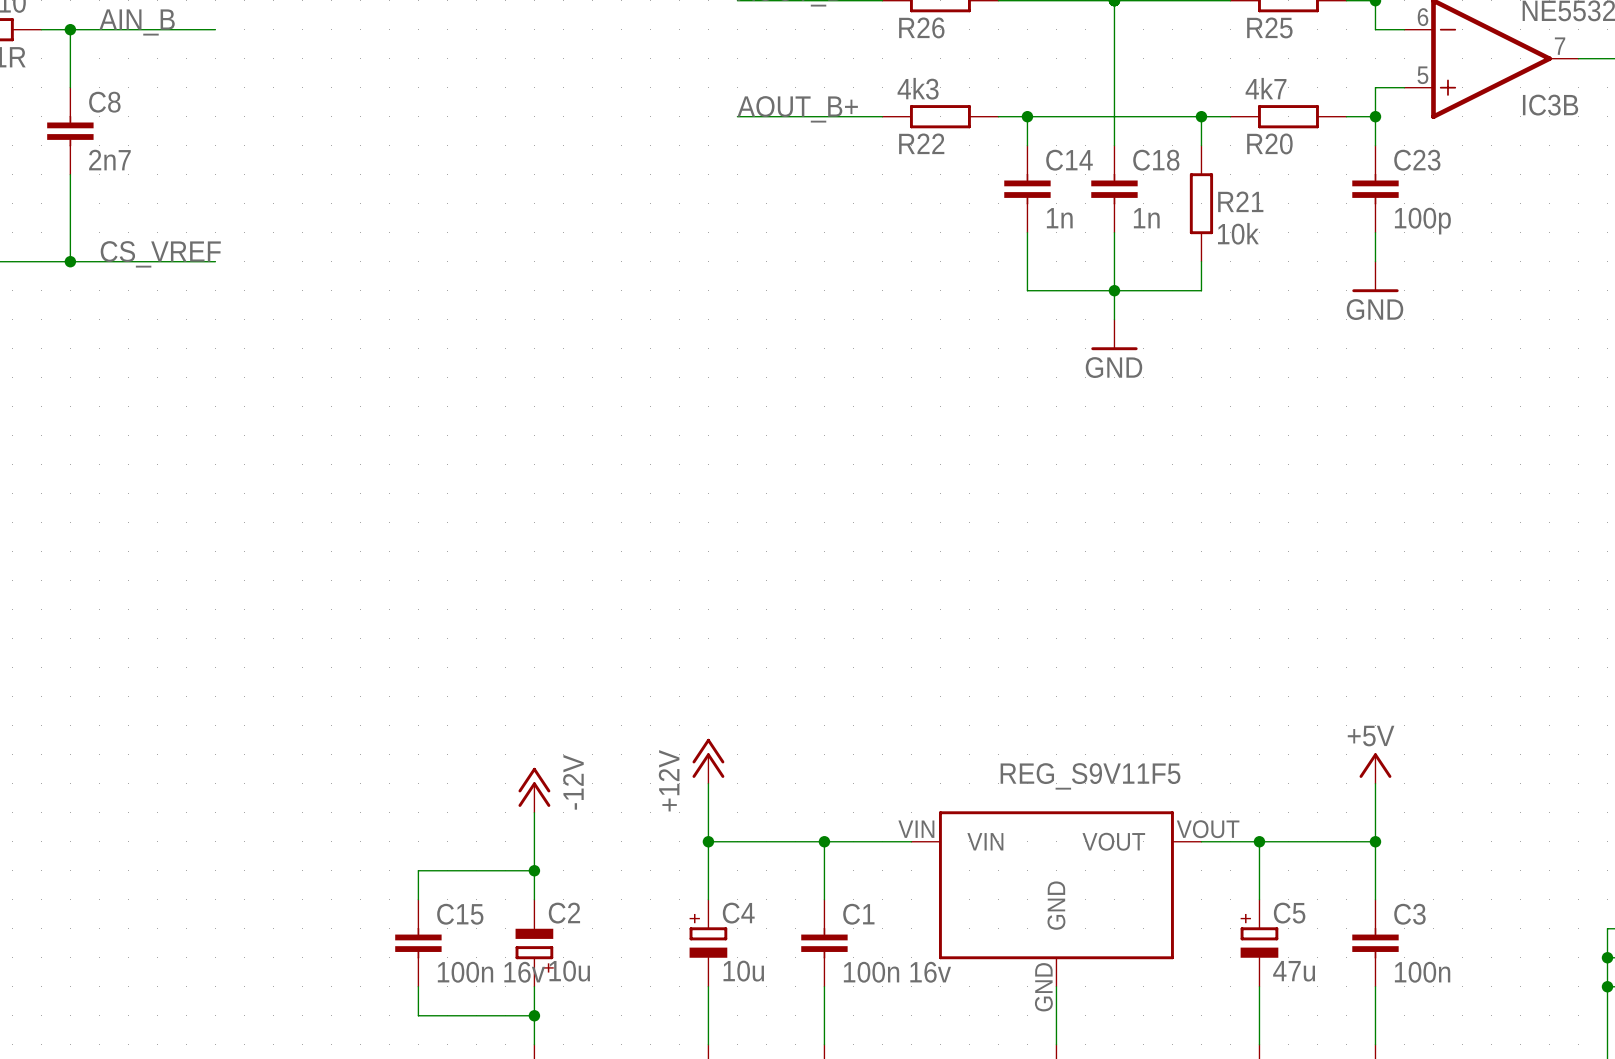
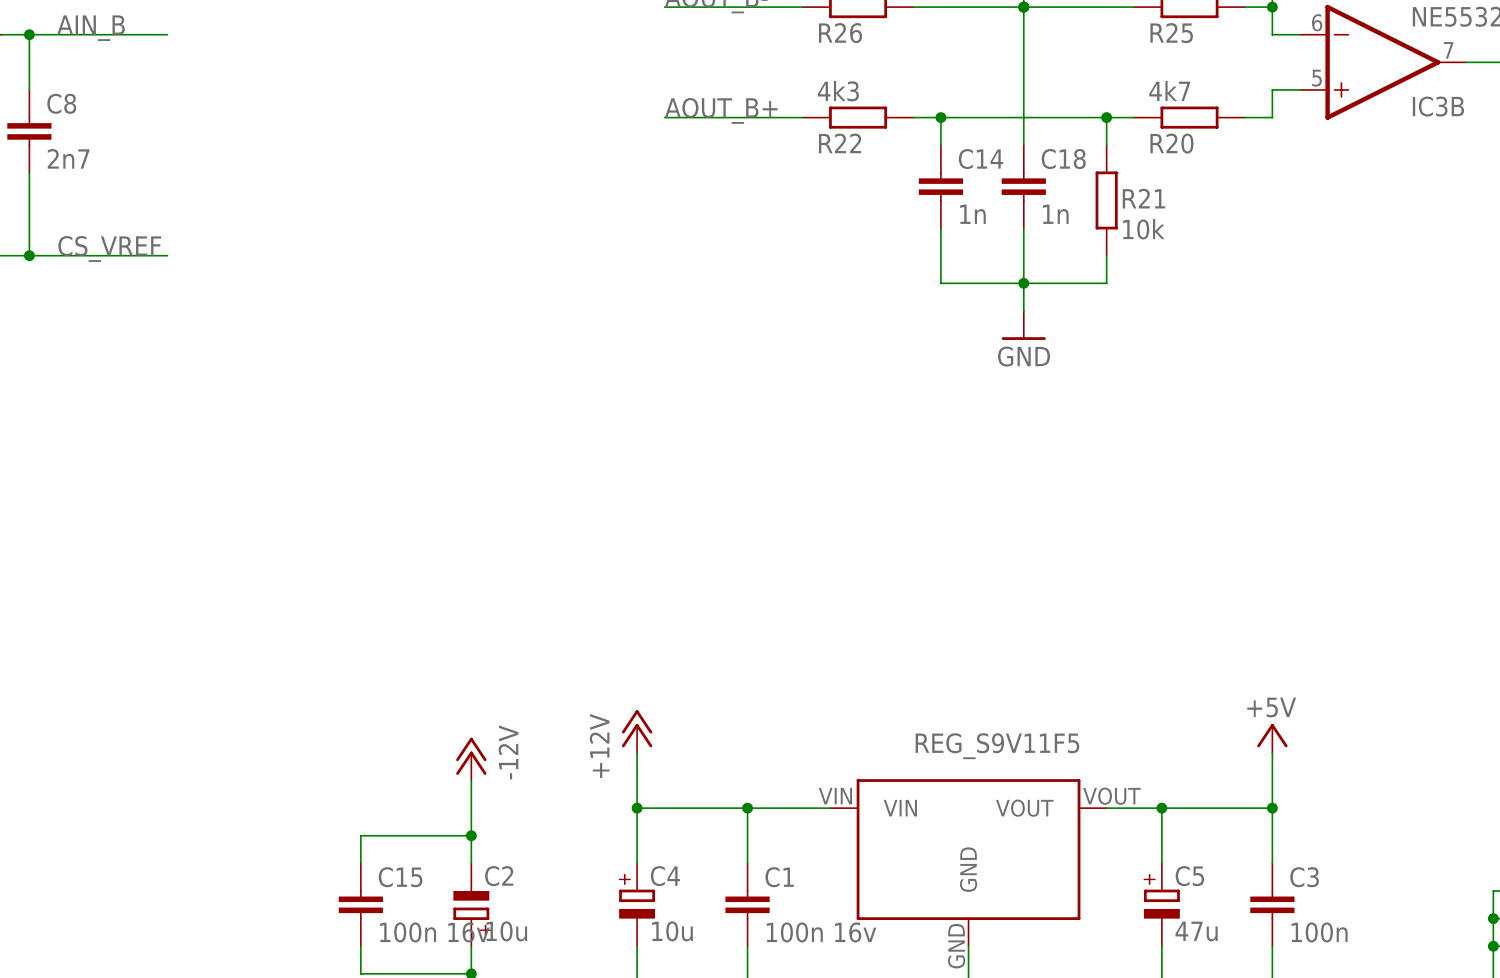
wire: (1375, 116) (1375, 145) -> none
junction: (1375, 116) -> none
C23: 100p (1375, 189) -> none
wire: (1375, 232) (1375, 261) -> none
power symbol: GND (1375, 276) -> none

